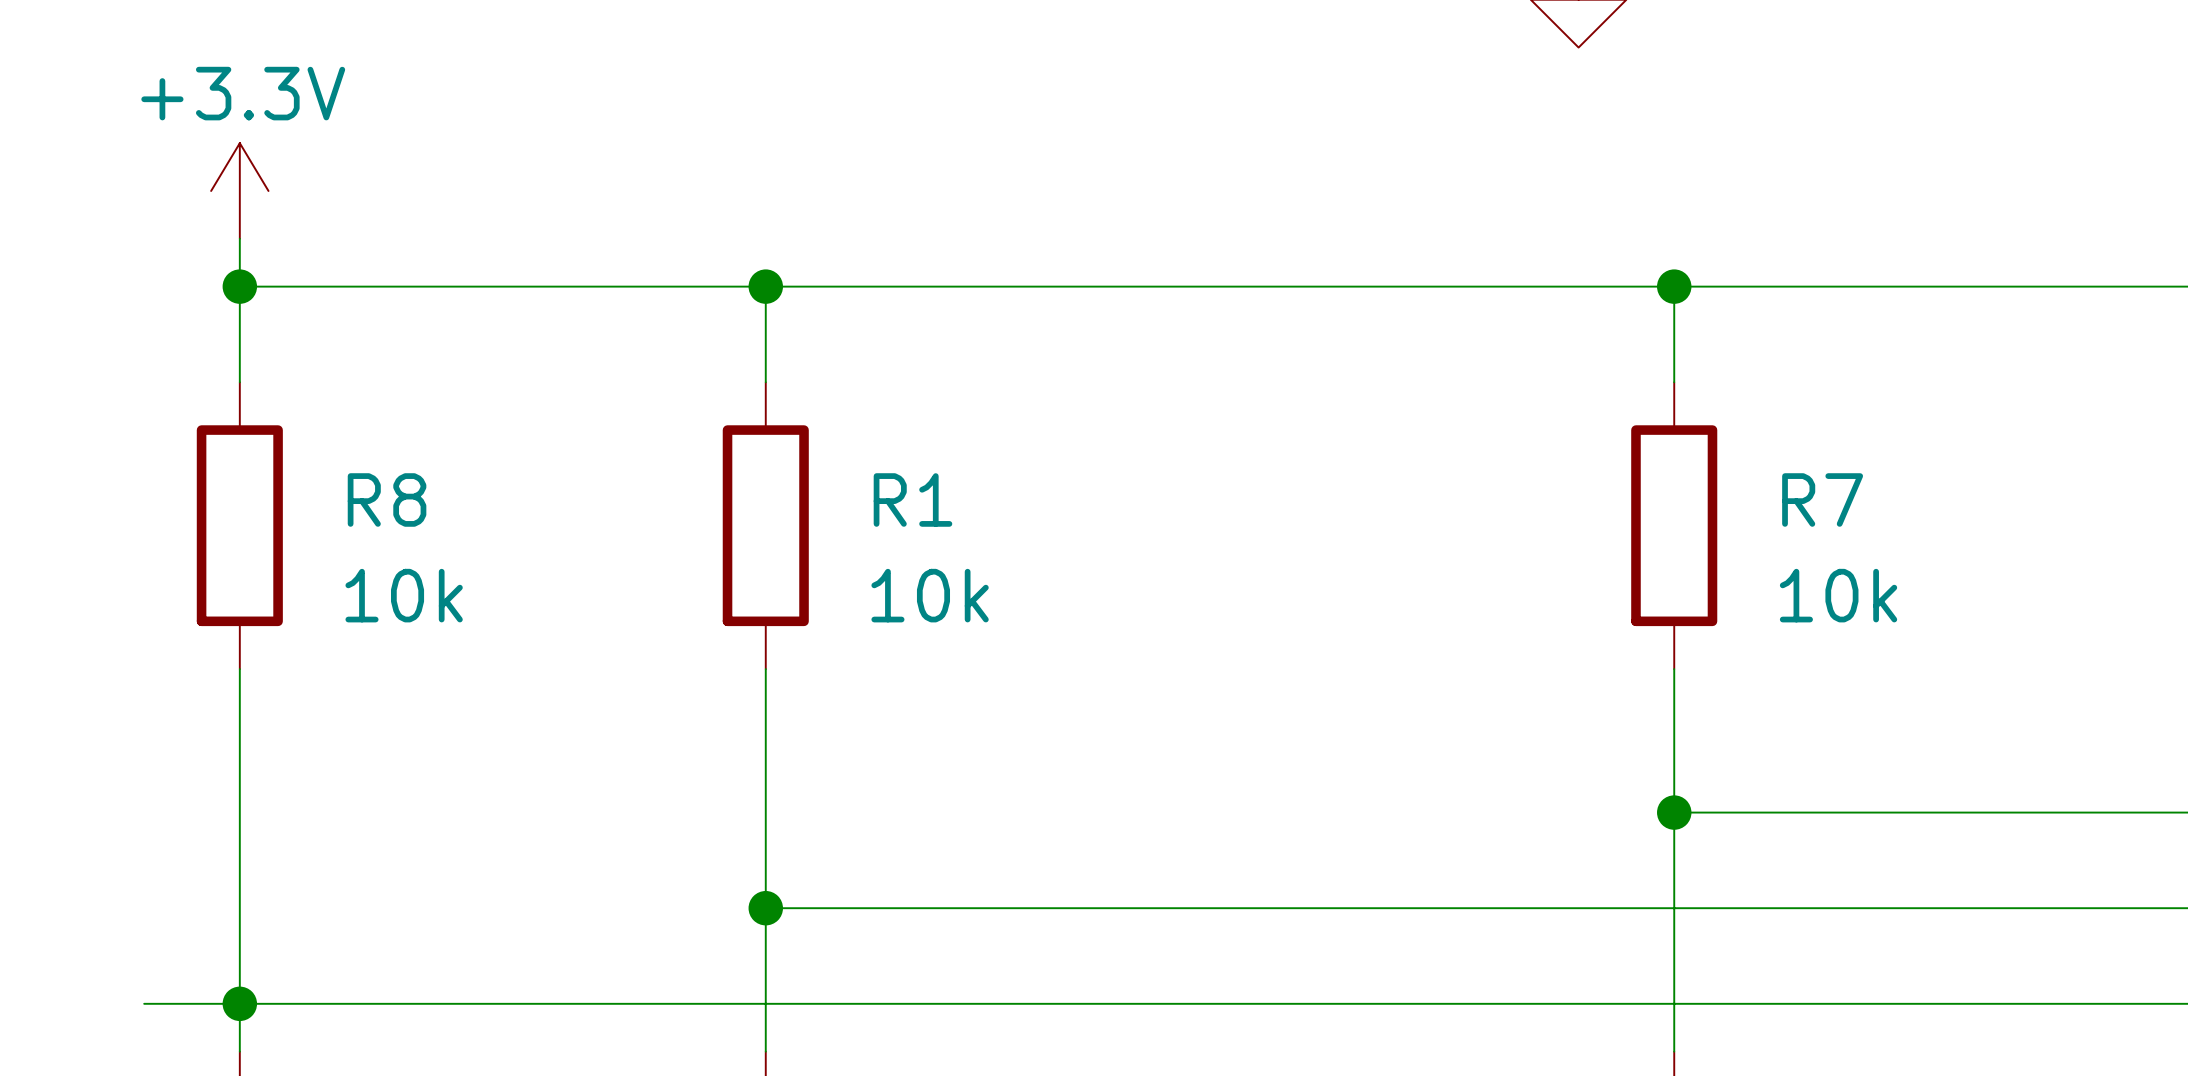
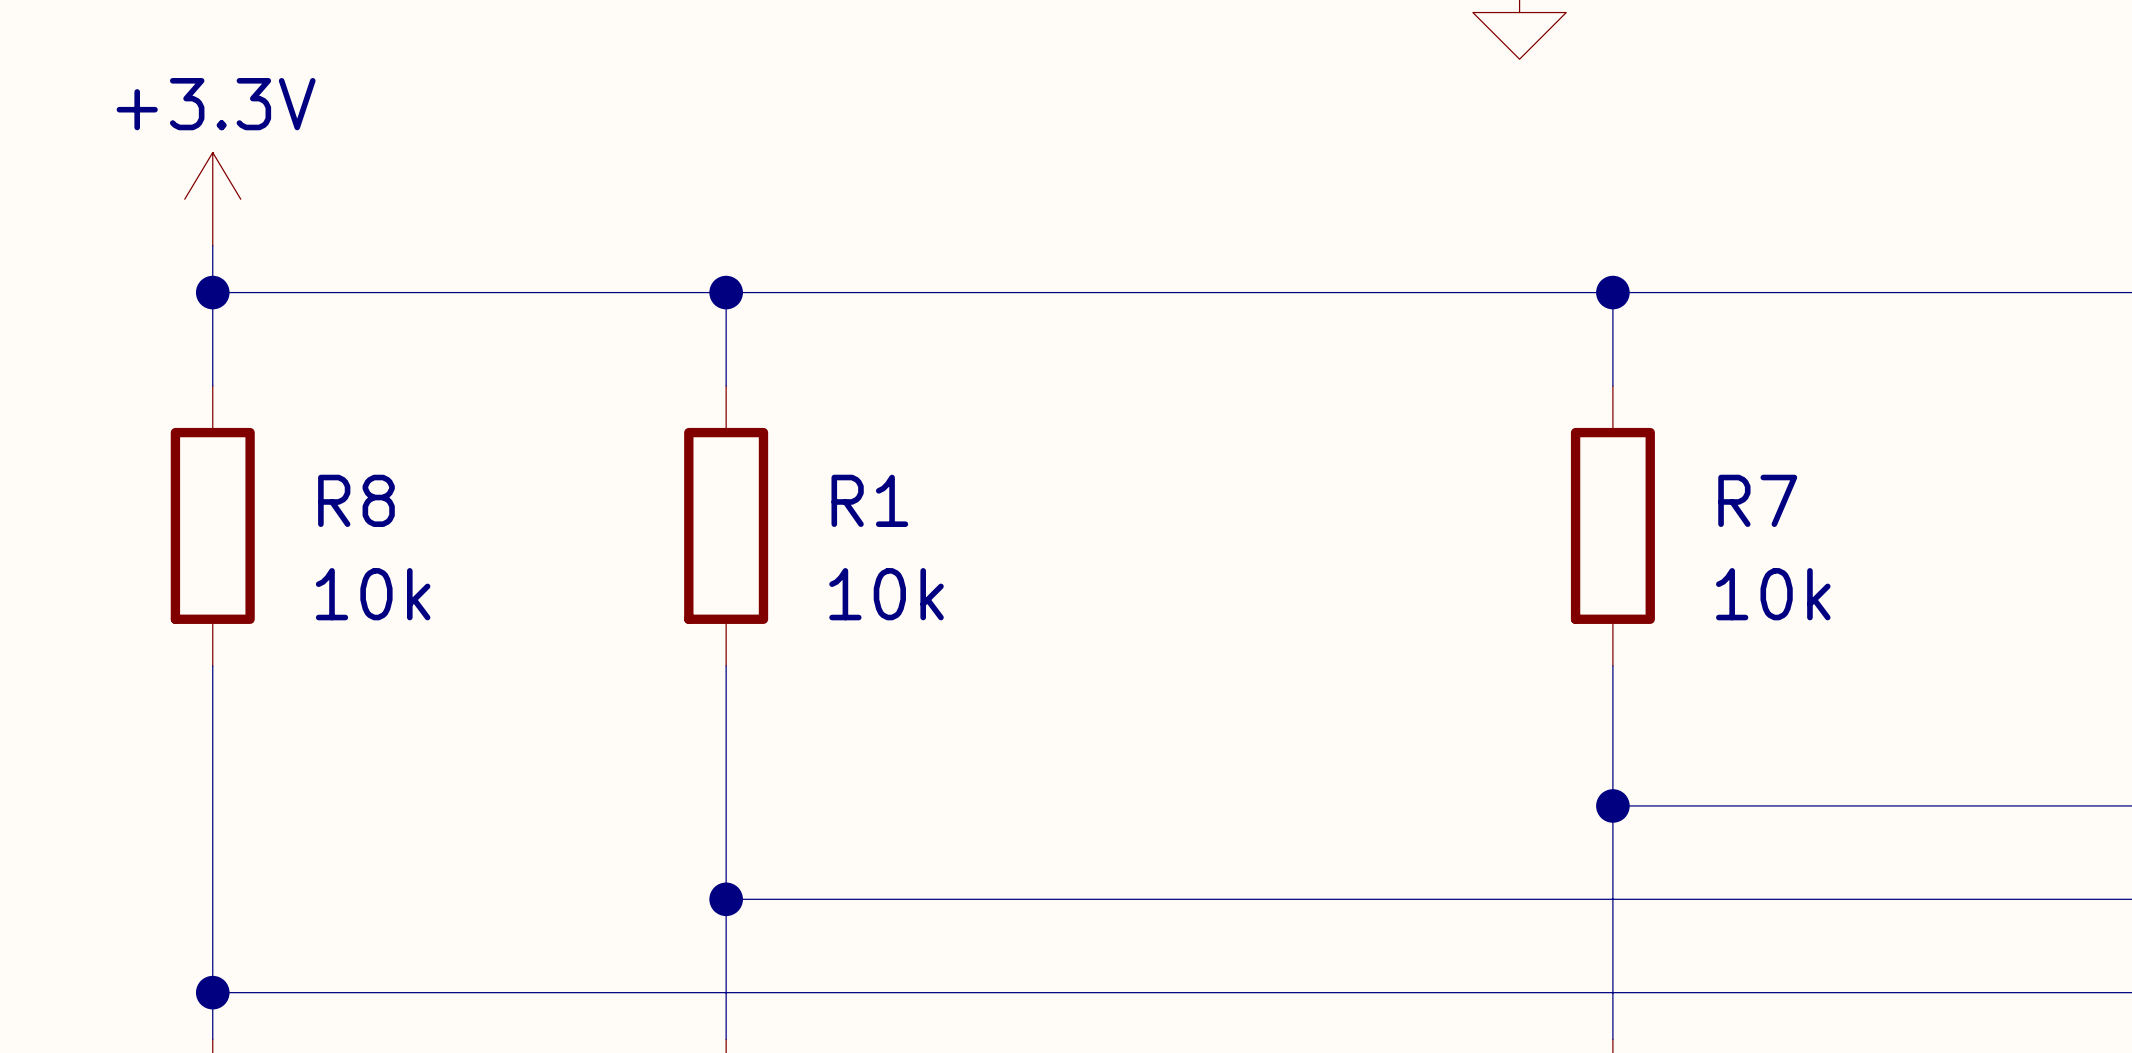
wire: (144, 1003) (239, 1003) -> none

